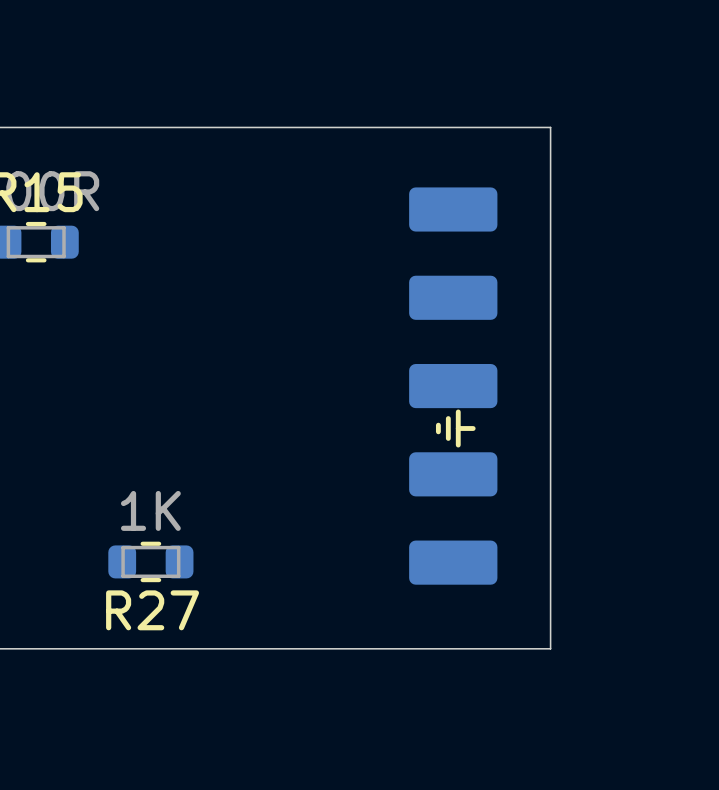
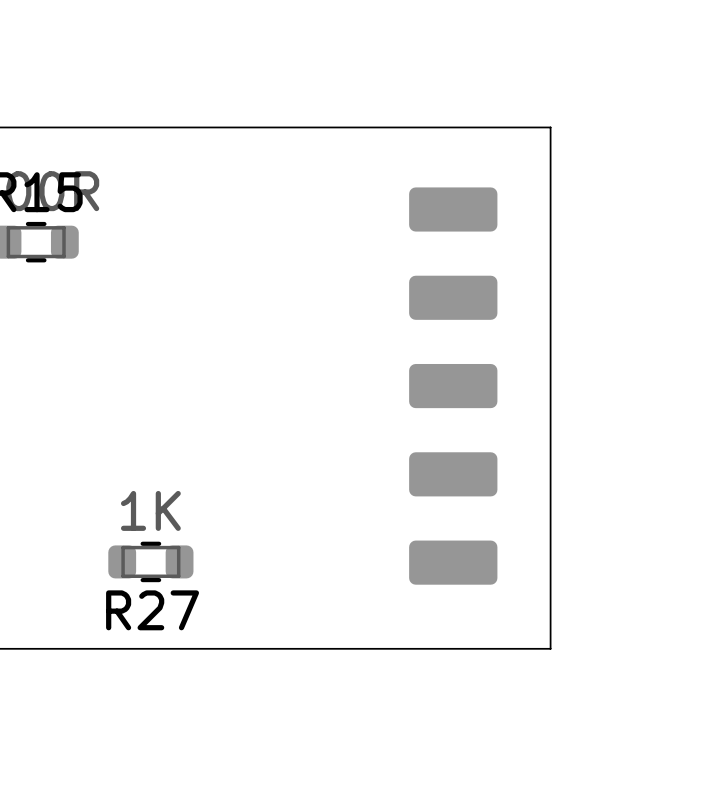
text: ⏚ (455, 428) -> none

